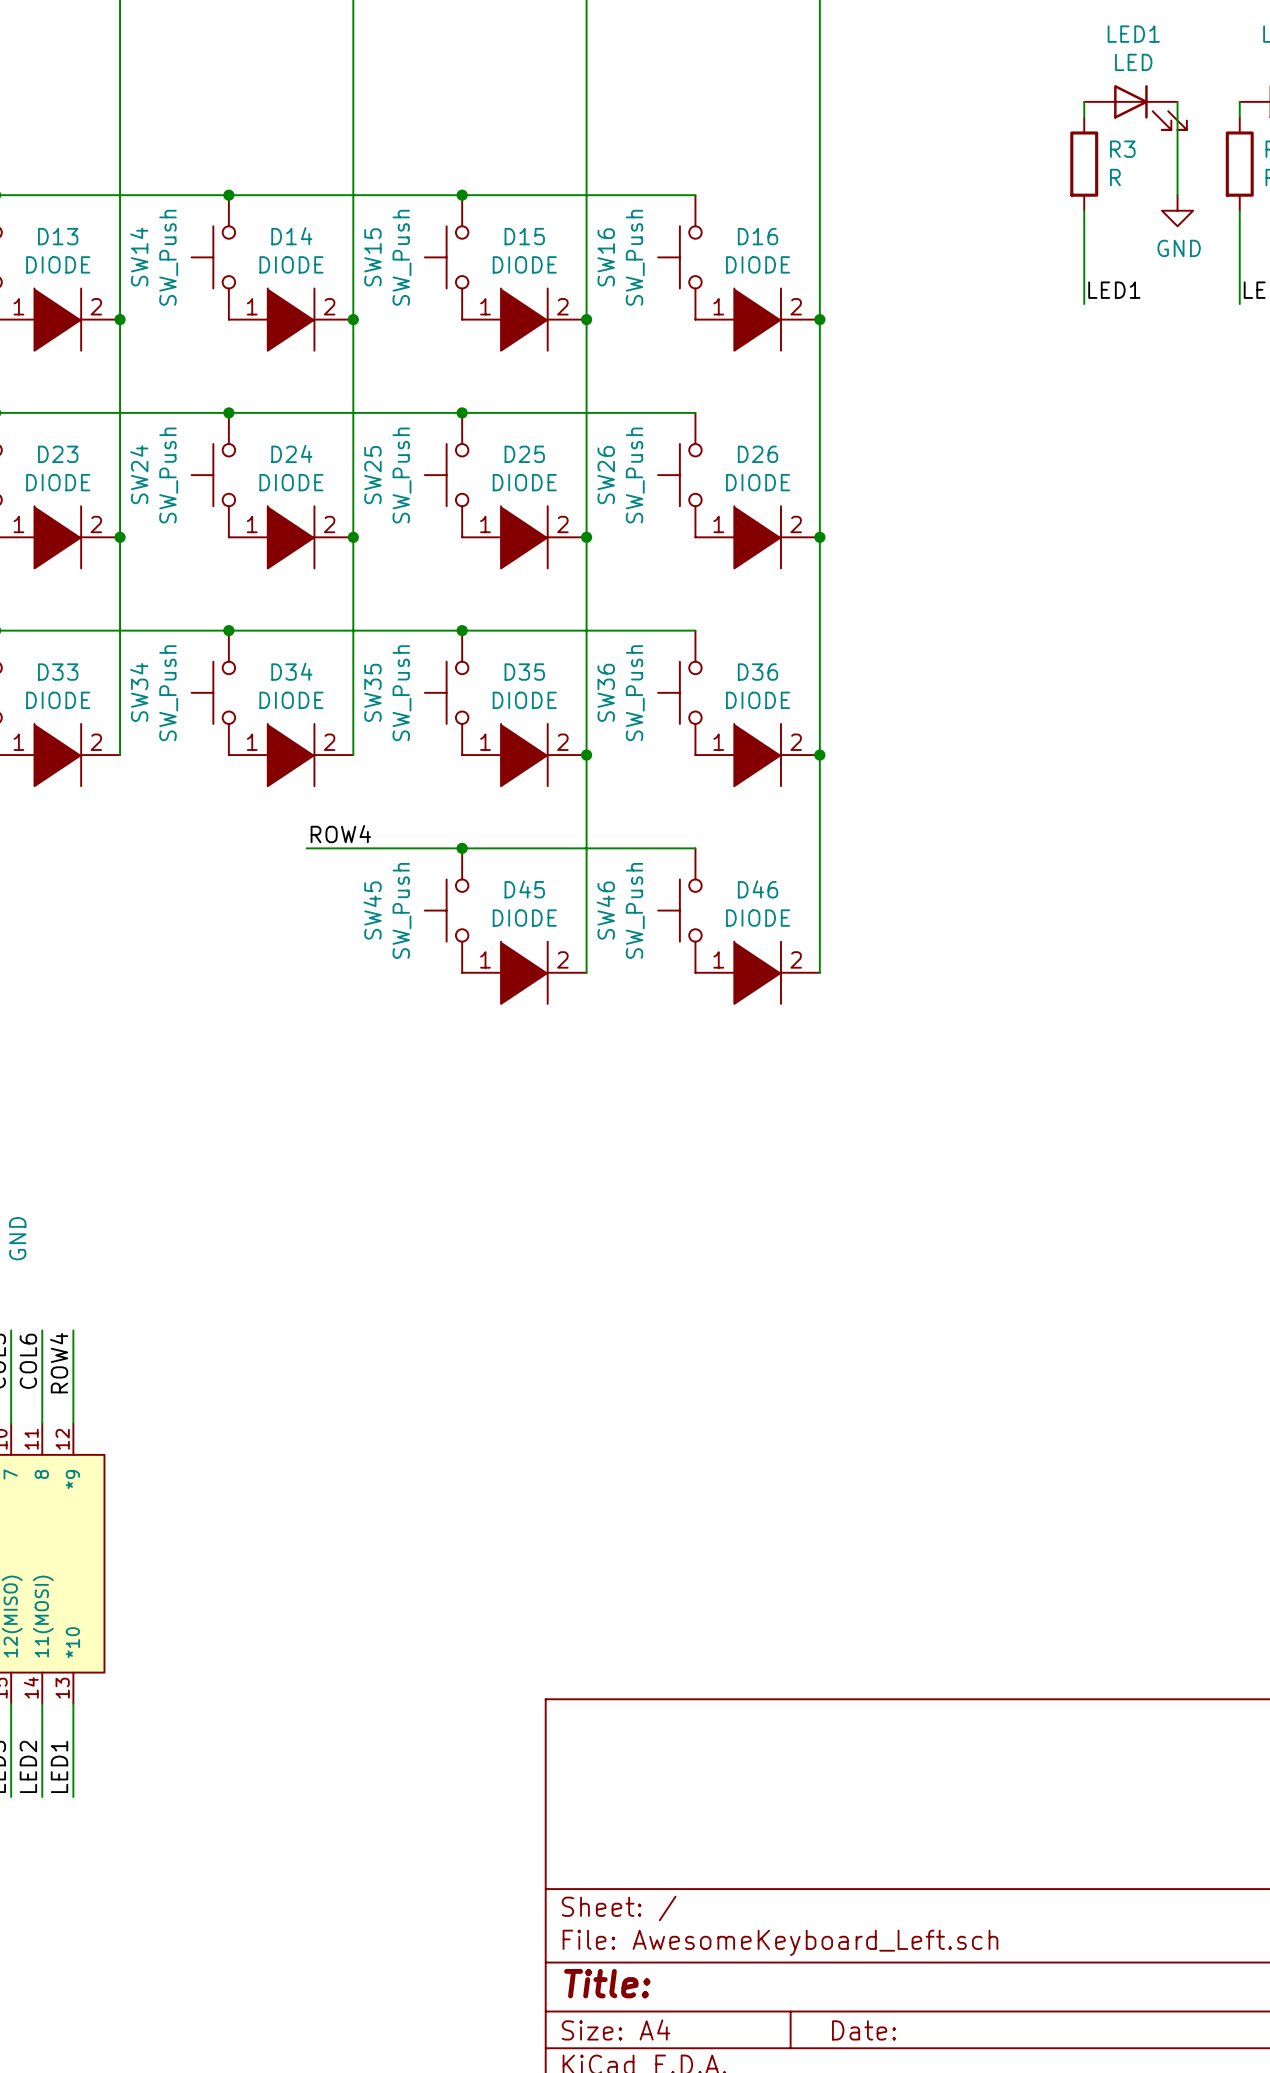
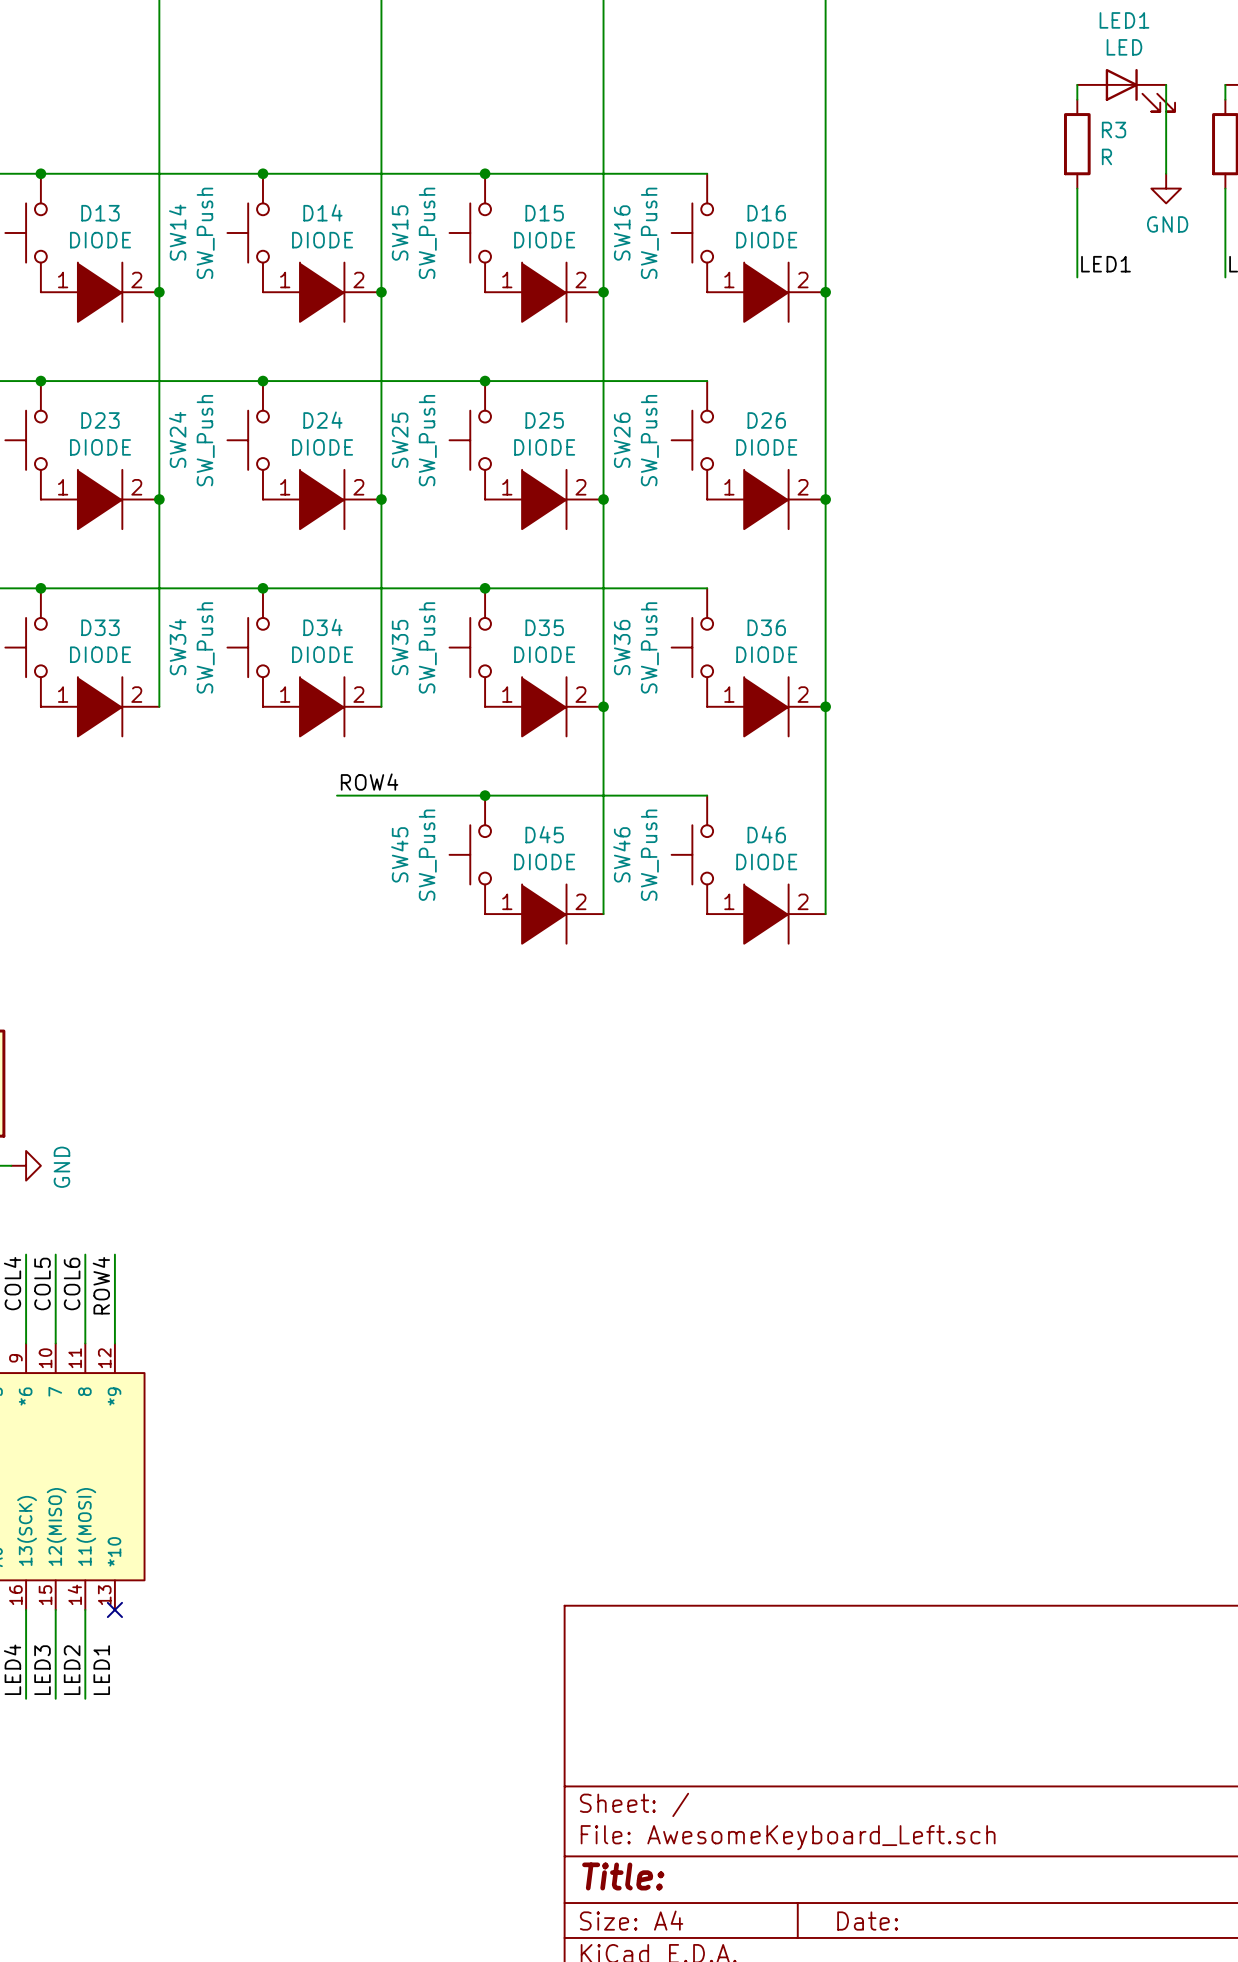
wire: (73, 1703) (73, 1797) -> none
no-connect mark: none -> (114, 1609)

